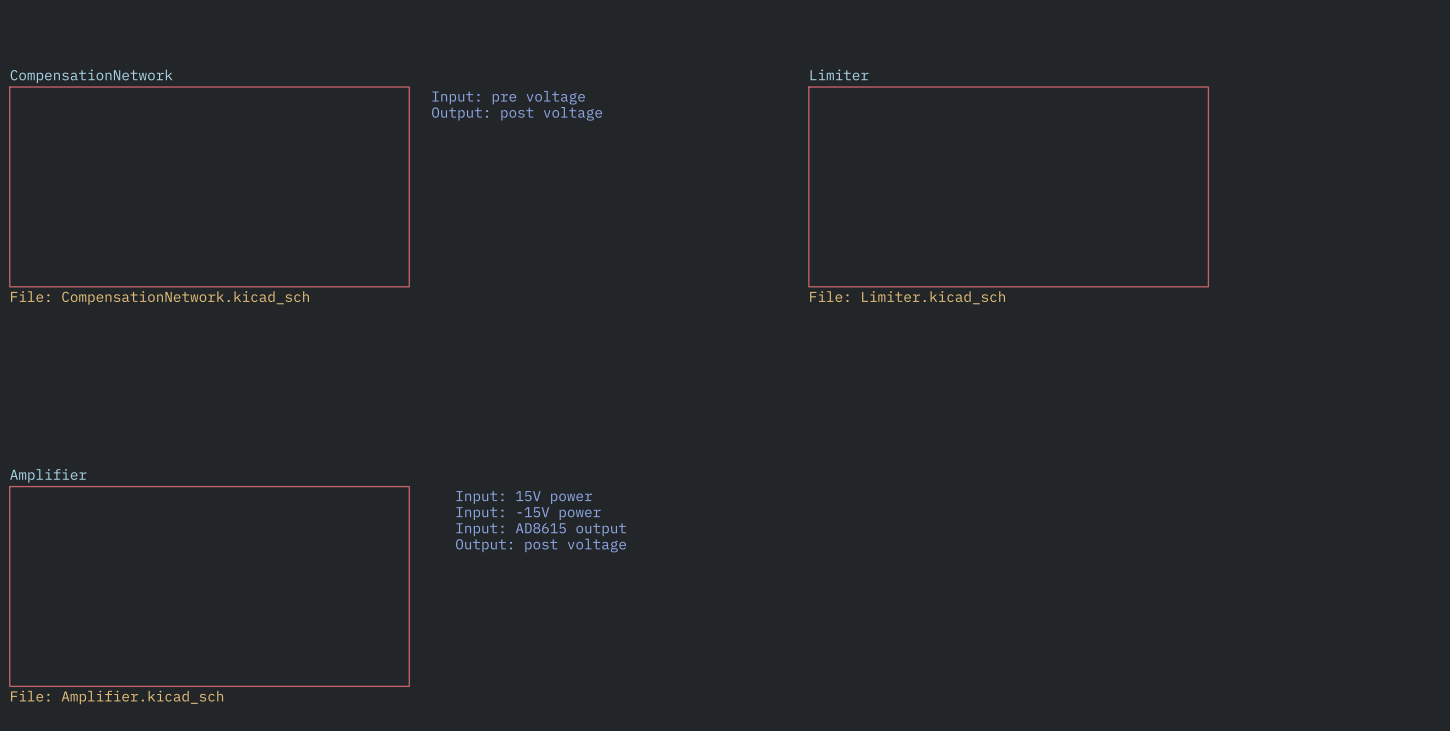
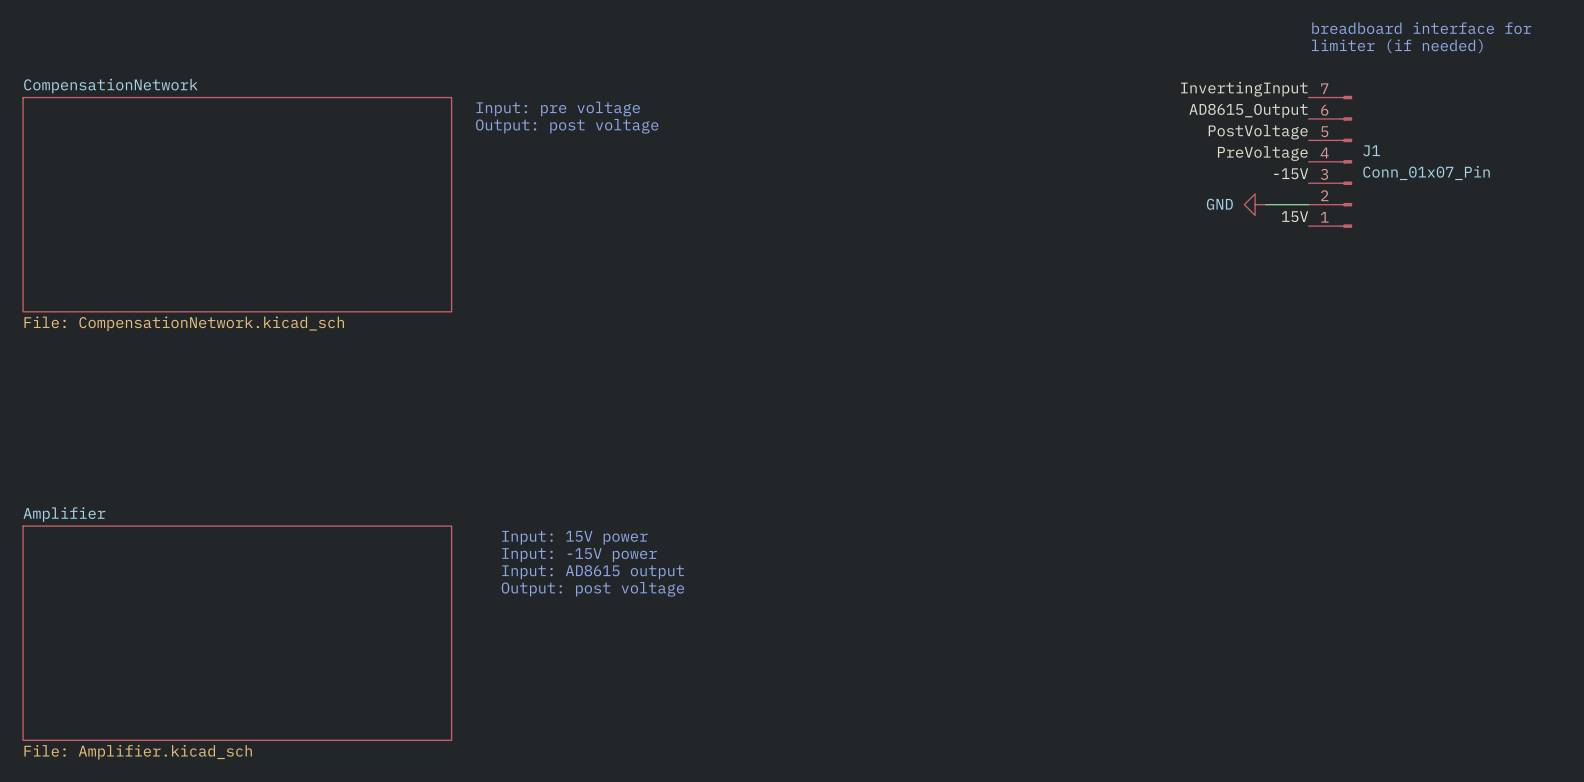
text: none -> breadboard interface for (1421, 28)
text: none -> limiter (if needed) (1397, 46)
label: none -> InvertingInput (1244, 89)
label: none -> AD8615_Output (1248, 110)
label: none -> PostVoltage (1258, 132)
label: none -> PreVoltage (1262, 153)
J1: none -> Conn_01x07_Pin (1330, 161)
label: none -> -15V (1291, 173)
sheet Limiter: File: Limiter.kicad_sch (1008, 186) -> none
power symbol: none -> GND (1255, 204)
wire: none -> (1265, 204) (1308, 204)
label: none -> 15V (1294, 216)

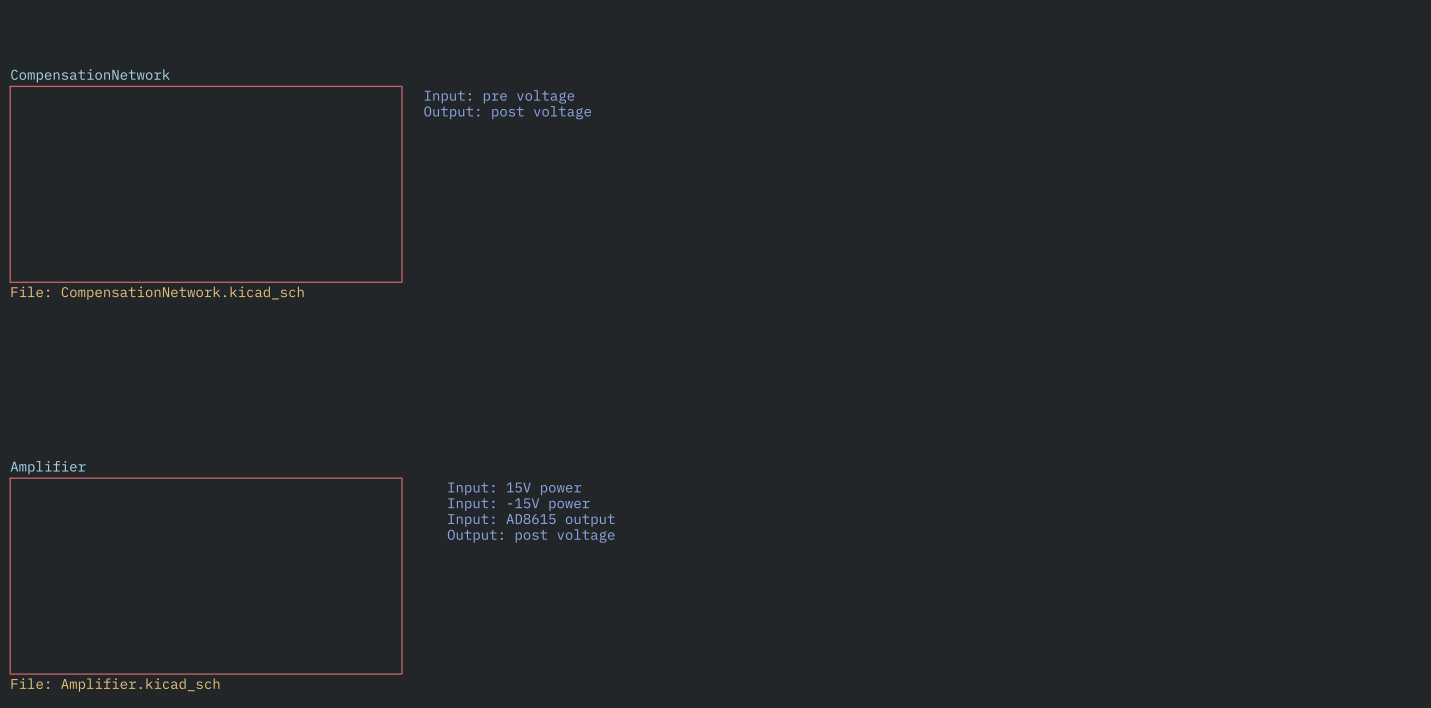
text: breadboard interface for (1421, 28) -> none
text: limiter (if needed) (1397, 46) -> none
label: InvertingInput (1244, 89) -> none
label: AD8615_Output (1248, 110) -> none
label: PostVoltage (1258, 132) -> none
label: PreVoltage (1262, 153) -> none
J1: Conn_01x07_Pin (1330, 161) -> none
label: -15V (1291, 173) -> none
power symbol: GND (1255, 204) -> none
wire: (1265, 204) (1308, 204) -> none
label: 15V (1294, 216) -> none

